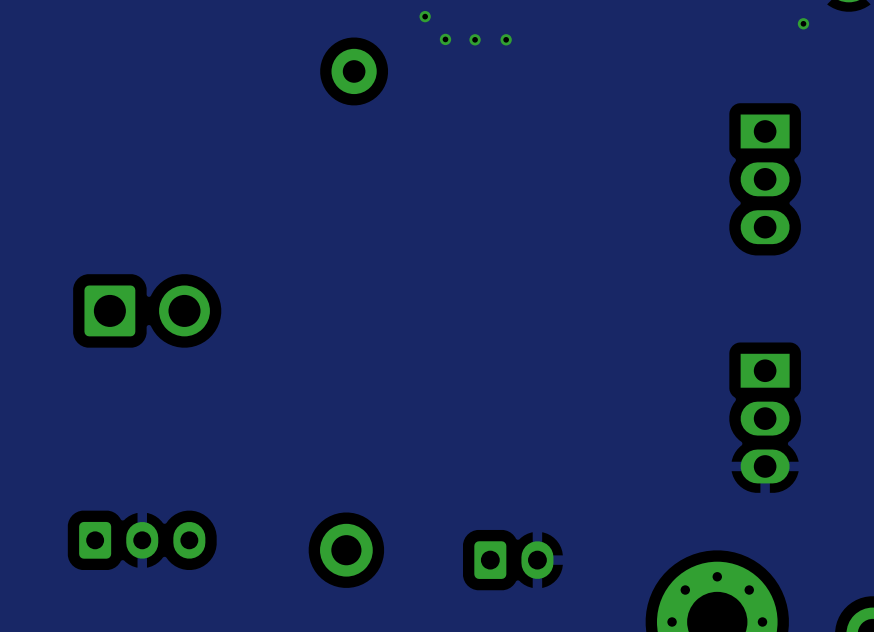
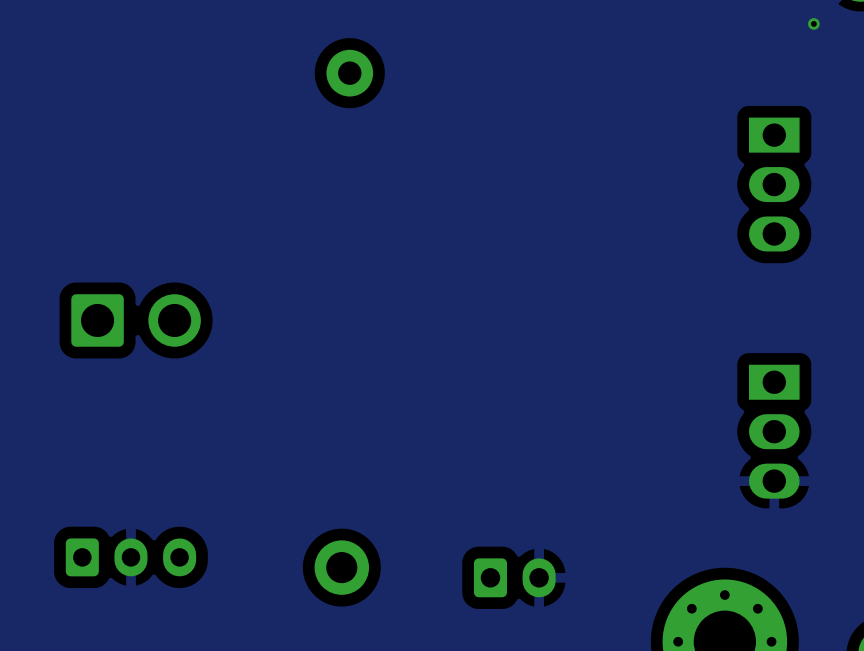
via: (425, 16) -> none
via: (445, 39) -> none
via: (475, 39) -> none
via: (506, 39) -> none

